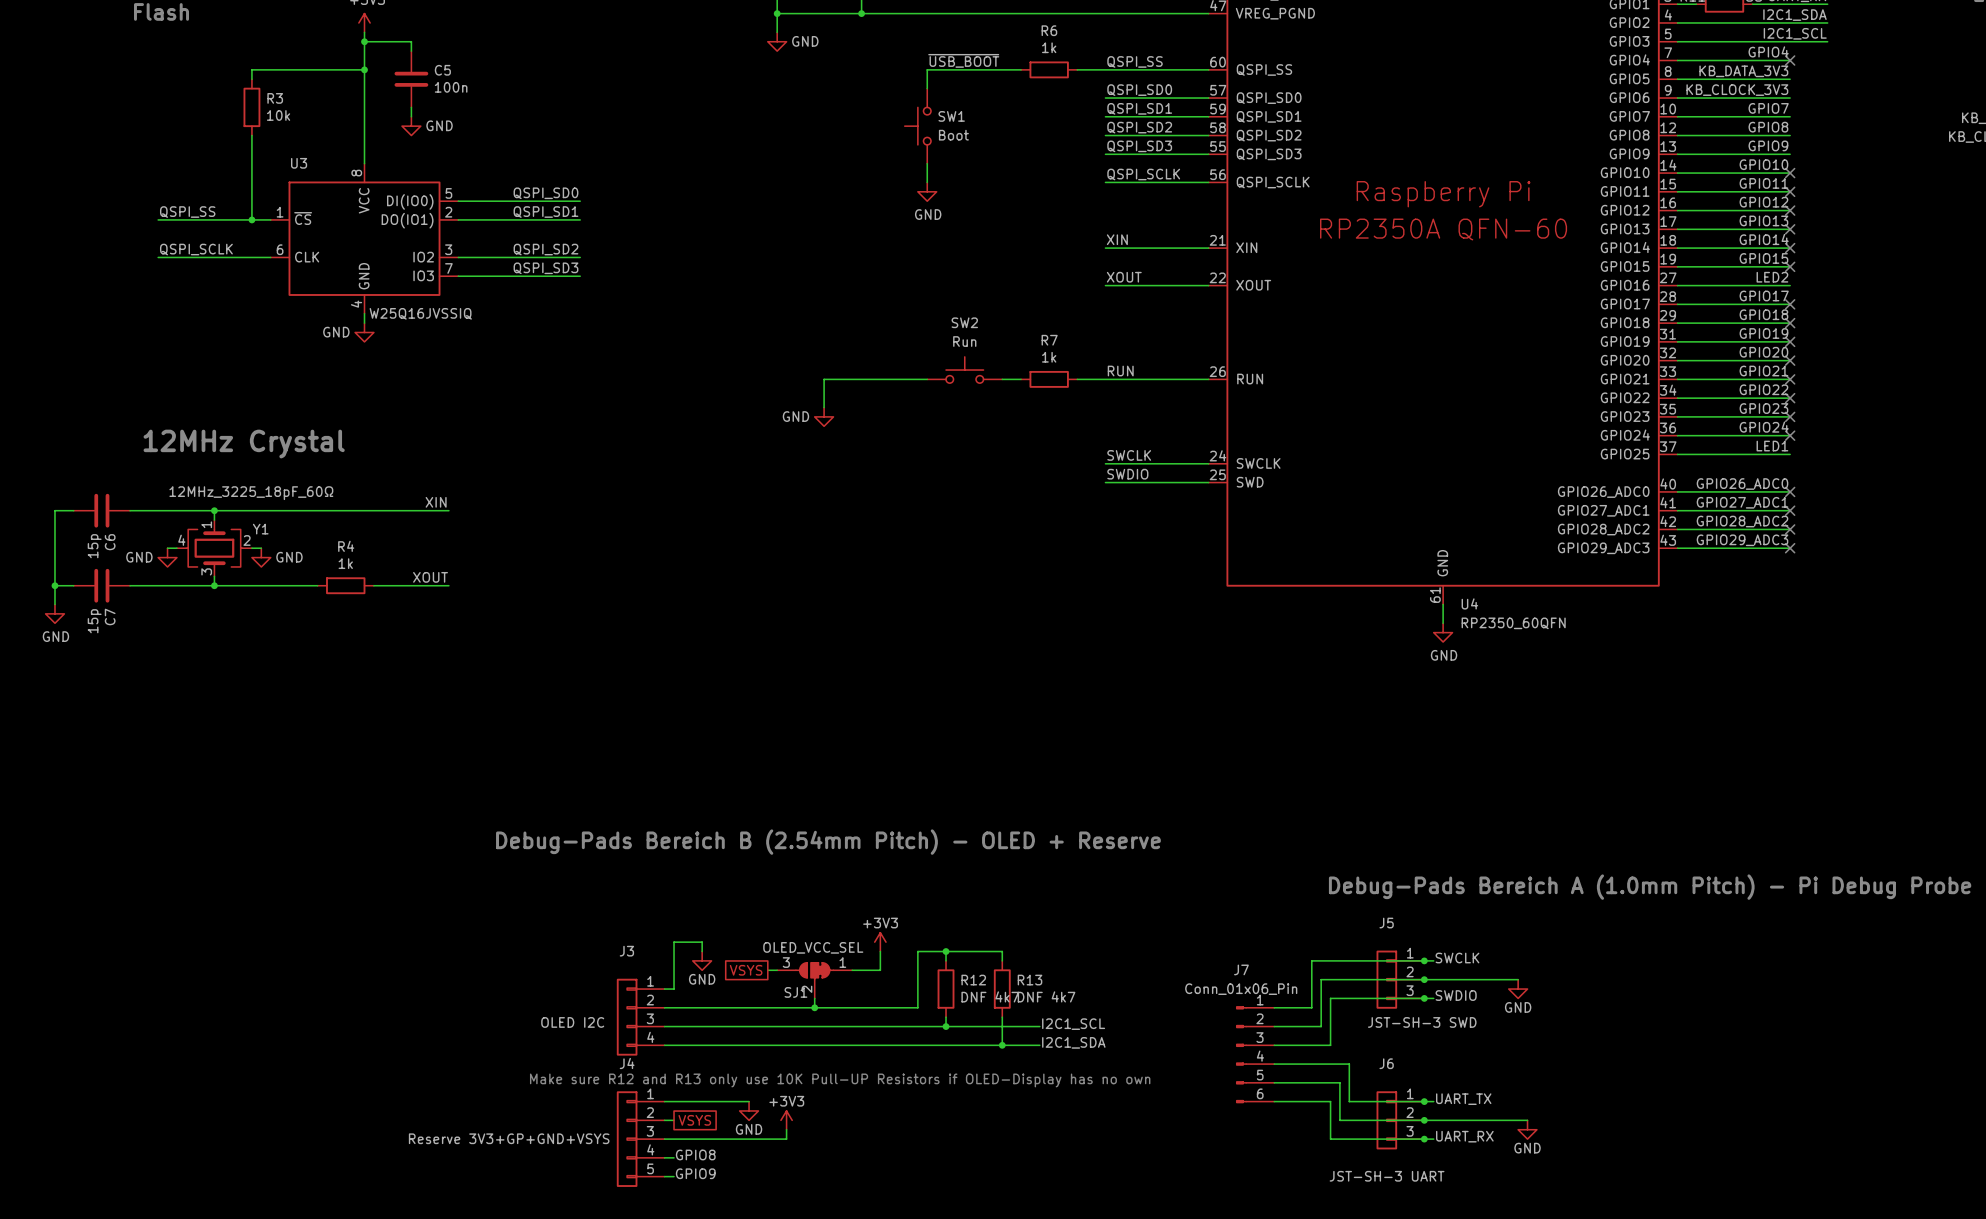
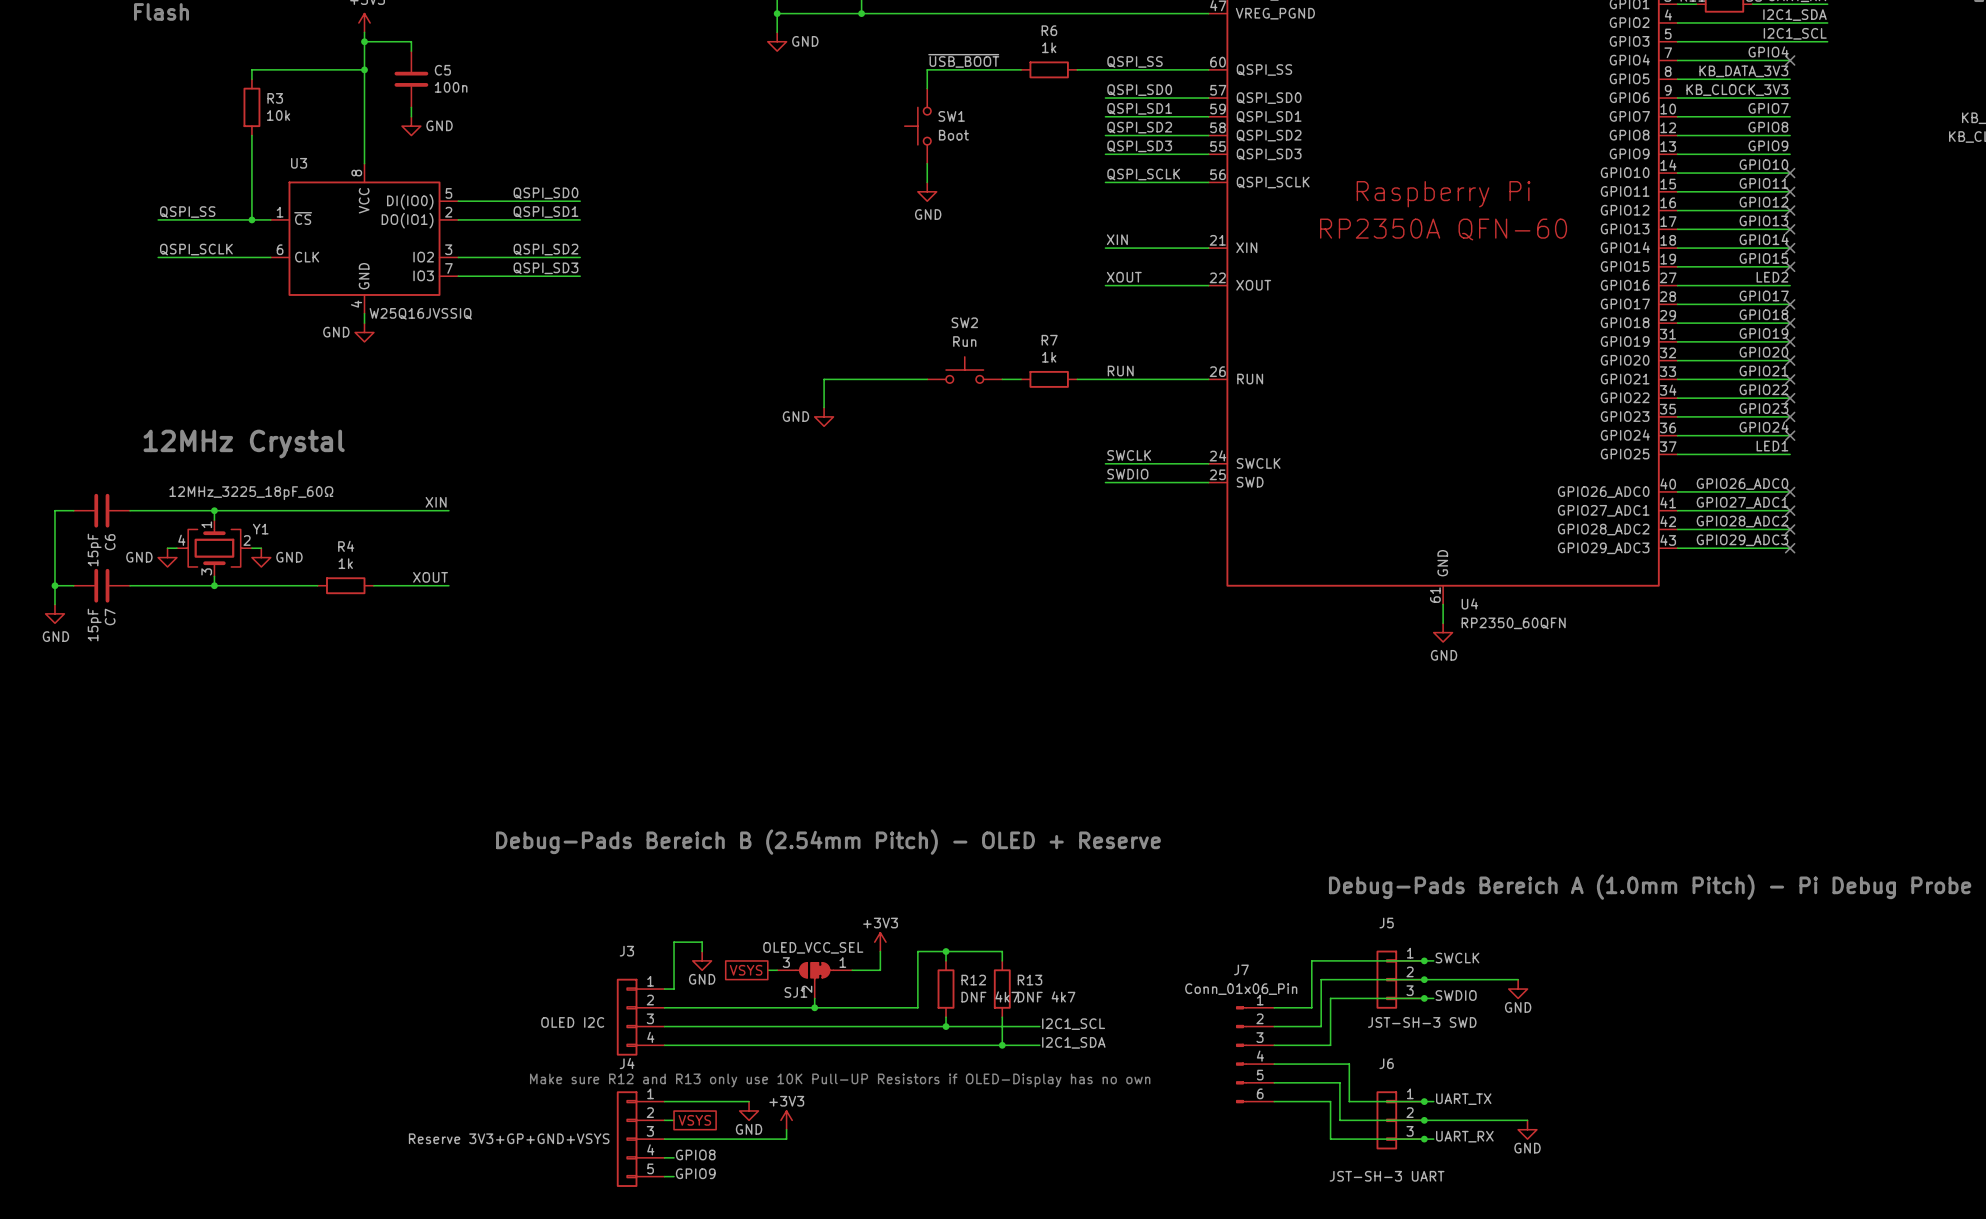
C6 value: 15p (94, 546) -> 15pF (94, 549)
C7 value: 15p (94, 621) -> 15pF (94, 625)

